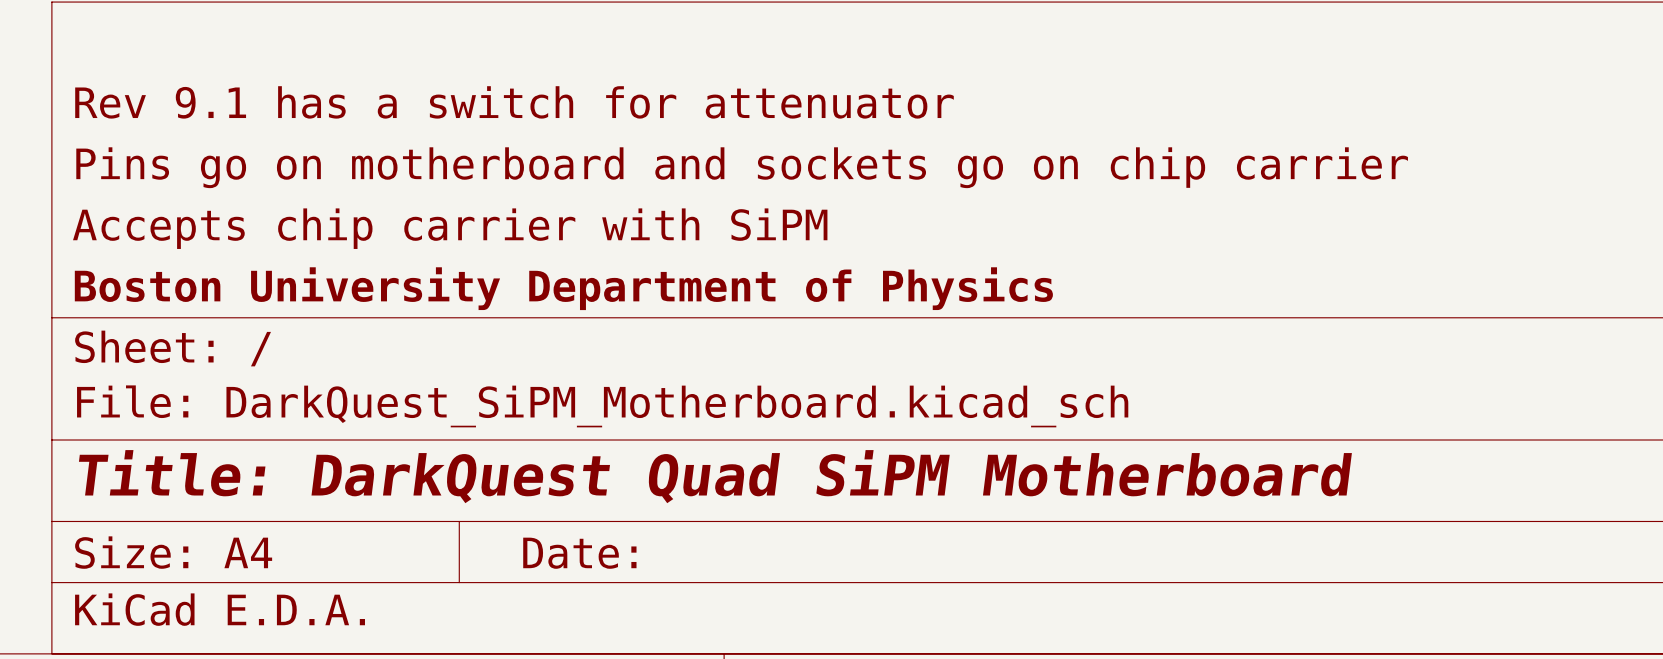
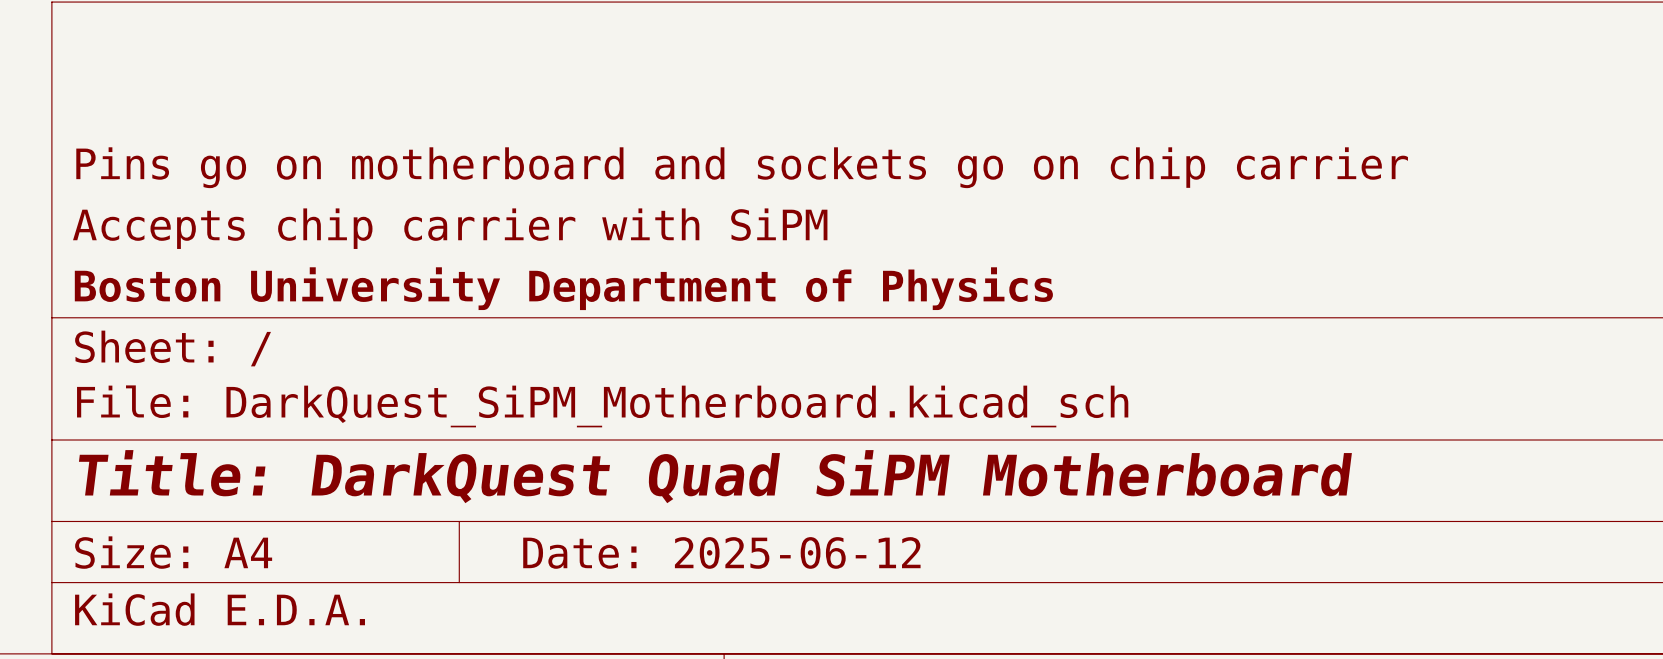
title block: Rev 9.1 has a switch for attenuator (514, 102) -> none
title block: Date: (579, 553) -> Date: 2025-06-12 (721, 552)

